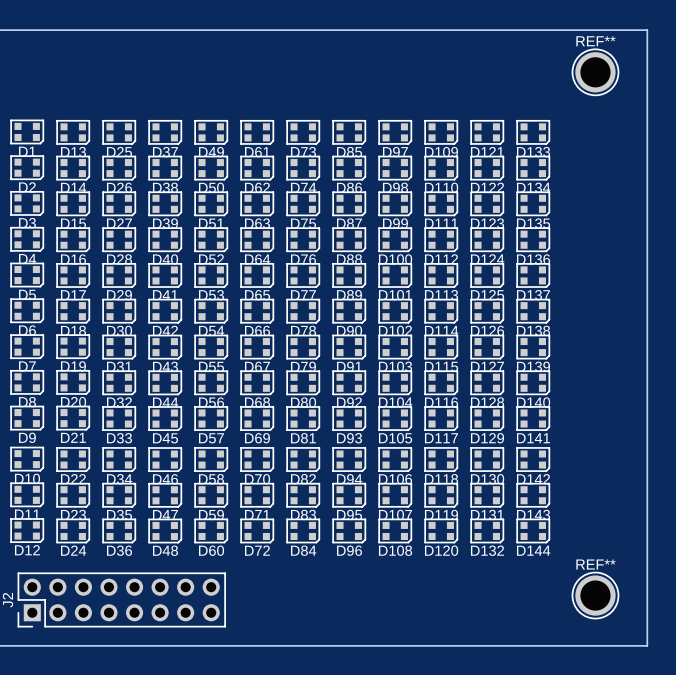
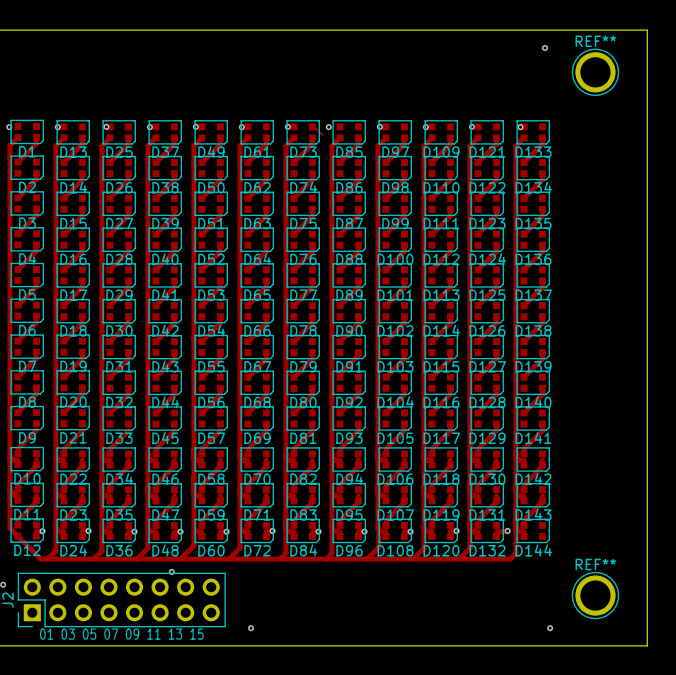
via: none -> (544, 48)
via: none -> (106, 126)
via: none -> (195, 126)
via: none -> (287, 126)
track: none -> (312, 126) (322, 134)
via: none -> (379, 126)
via: none -> (471, 126)
via: none -> (9, 127)
via: none -> (57, 127)
via: none -> (149, 127)
via: none -> (241, 127)
via: none -> (328, 127)
via: none -> (425, 127)
via: none -> (520, 127)
track: none -> (18, 137) (9, 145) (9, 528) (40, 559) (510, 559) (515, 553) (515, 145) (524, 137)
track: none -> (36, 137) (36, 143) (18, 162)
track: none -> (64, 137) (55, 145) (55, 550) (47, 559)
track: none -> (82, 137) (82, 144) (64, 162)
track: none -> (110, 137) (101, 145) (101, 550) (93, 559)
track: none -> (128, 137) (128, 144) (110, 162)
track: none -> (156, 137) (147, 145) (147, 548) (137, 559)
track: none -> (174, 137) (174, 144) (156, 162)
track: none -> (202, 137) (193, 145) (193, 545) (180, 559)
track: none -> (220, 137) (220, 144) (202, 162)
track: none -> (248, 137) (239, 145) (239, 548) (229, 559)
track: none -> (266, 137) (266, 144) (248, 162)
track: none -> (294, 137) (285, 145) (285, 553) (280, 559)
track: none -> (312, 137) (312, 144) (294, 162)
track: none -> (340, 137) (331, 145) (331, 553) (326, 559)
track: none -> (358, 137) (358, 144) (340, 162)
track: none -> (386, 137) (377, 145) (377, 528) (380, 531) (386, 531)
track: none -> (404, 137) (404, 144) (386, 162)
track: none -> (432, 137) (423, 145) (423, 548) (413, 559)
track: none -> (450, 137) (450, 144) (432, 162)
track: none -> (478, 137) (469, 145) (469, 548) (459, 559)
track: none -> (496, 137) (496, 144) (478, 162)
track: none -> (542, 137) (542, 144) (524, 162)
track: none -> (36, 173) (36, 179) (18, 197)
track: none -> (82, 173) (82, 179) (64, 198)
track: none -> (128, 173) (128, 179) (110, 198)
track: none -> (174, 173) (174, 179) (156, 198)
track: none -> (220, 173) (220, 179) (202, 198)
track: none -> (266, 173) (266, 179) (248, 198)
track: none -> (312, 173) (312, 179) (294, 198)
track: none -> (358, 173) (358, 179) (340, 198)
track: none -> (404, 173) (404, 179) (386, 198)
track: none -> (450, 173) (450, 179) (432, 198)
track: none -> (496, 173) (496, 179) (478, 198)
track: none -> (542, 173) (542, 179) (524, 198)
track: none -> (36, 208) (36, 215) (18, 233)
track: none -> (82, 209) (82, 215) (64, 234)
track: none -> (128, 209) (128, 215) (110, 234)
track: none -> (174, 209) (174, 215) (156, 234)
track: none -> (220, 209) (220, 215) (202, 234)
track: none -> (266, 209) (266, 215) (248, 234)
track: none -> (312, 209) (312, 215) (294, 234)
track: none -> (358, 209) (358, 215) (340, 234)
track: none -> (404, 209) (404, 215) (386, 234)
track: none -> (450, 209) (450, 215) (432, 234)
track: none -> (496, 209) (496, 215) (478, 234)
track: none -> (542, 209) (542, 215) (524, 234)
track: none -> (36, 244) (36, 251) (18, 269)
track: none -> (82, 245) (82, 251) (64, 269)
track: none -> (128, 245) (128, 251) (110, 269)
track: none -> (174, 245) (174, 251) (156, 269)
track: none -> (220, 245) (220, 251) (202, 269)
track: none -> (266, 245) (266, 251) (248, 269)
track: none -> (312, 245) (312, 251) (294, 269)
track: none -> (358, 245) (358, 251) (340, 269)
track: none -> (404, 245) (404, 251) (386, 269)
track: none -> (450, 245) (450, 251) (432, 269)
track: none -> (496, 245) (496, 251) (478, 269)
track: none -> (542, 245) (542, 251) (524, 269)
track: none -> (36, 280) (36, 286) (18, 305)
track: none -> (82, 280) (82, 287) (64, 305)
track: none -> (128, 280) (128, 287) (110, 305)
track: none -> (174, 280) (174, 287) (156, 305)
track: none -> (220, 280) (220, 287) (202, 305)
track: none -> (266, 280) (266, 287) (248, 305)
track: none -> (312, 280) (312, 287) (294, 305)
track: none -> (358, 280) (358, 287) (340, 305)
track: none -> (404, 280) (404, 287) (386, 305)
track: none -> (450, 280) (450, 287) (432, 305)
track: none -> (496, 280) (496, 287) (478, 305)
track: none -> (542, 280) (542, 287) (524, 305)
track: none -> (36, 316) (36, 322) (18, 341)
track: none -> (82, 316) (82, 322) (64, 341)
track: none -> (128, 316) (128, 323) (110, 341)
track: none -> (174, 316) (174, 323) (156, 341)
track: none -> (220, 316) (220, 323) (202, 341)
track: none -> (266, 316) (266, 323) (248, 341)
track: none -> (312, 316) (312, 323) (294, 341)
track: none -> (358, 316) (358, 323) (340, 341)
track: none -> (404, 316) (404, 323) (386, 341)
track: none -> (450, 316) (450, 323) (432, 341)
track: none -> (496, 316) (496, 323) (478, 341)
track: none -> (542, 316) (542, 323) (524, 341)
track: none -> (36, 352) (36, 358) (18, 376)
track: none -> (82, 352) (82, 358) (64, 376)
track: none -> (128, 352) (128, 358) (110, 377)
track: none -> (174, 352) (174, 358) (156, 377)
track: none -> (220, 352) (220, 358) (202, 377)
track: none -> (266, 352) (266, 358) (248, 377)
track: none -> (312, 352) (312, 358) (294, 377)
track: none -> (358, 352) (358, 355) (340, 374) (340, 377)
track: none -> (404, 352) (404, 358) (386, 377)
track: none -> (450, 352) (450, 358) (432, 377)
track: none -> (496, 352) (496, 358) (478, 377)
track: none -> (542, 352) (542, 358) (524, 377)
track: none -> (36, 387) (36, 394) (18, 412)
track: none -> (82, 387) (82, 394) (64, 412)
track: none -> (128, 388) (128, 394) (110, 412)
track: none -> (174, 388) (174, 394) (156, 413)
track: none -> (220, 388) (220, 394) (202, 412)
track: none -> (266, 388) (266, 394) (248, 412)
track: none -> (312, 388) (312, 394) (294, 413)
track: none -> (358, 388) (358, 393) (340, 412)
track: none -> (404, 388) (404, 394) (386, 412)
track: none -> (450, 388) (450, 394) (432, 412)
track: none -> (496, 388) (496, 394) (478, 412)
track: none -> (542, 388) (542, 394) (524, 412)
track: none -> (266, 424) (266, 430) (248, 449)
track: none -> (312, 424) (312, 430) (294, 449)
track: none -> (358, 424) (358, 430) (340, 449)
track: none -> (404, 424) (404, 430) (386, 449)
track: none -> (450, 424) (450, 430) (432, 449)
track: none -> (496, 424) (496, 430) (478, 449)
track: none -> (542, 424) (542, 430) (524, 449)
track: none -> (36, 430) (18, 448)
track: none -> (82, 430) (64, 449)
track: none -> (128, 430) (110, 449)
track: none -> (174, 430) (156, 449)
track: none -> (220, 430) (202, 449)
track: none -> (9, 456) (12, 459) (18, 459)
track: none -> (55, 457) (58, 460) (64, 460)
track: none -> (101, 457) (104, 460) (110, 460)
track: none -> (147, 457) (150, 460) (156, 460)
track: none -> (193, 457) (196, 460) (202, 460)
track: none -> (239, 457) (242, 460) (248, 460)
track: none -> (285, 457) (288, 460) (294, 460)
track: none -> (331, 457) (334, 460) (340, 460)
track: none -> (377, 457) (380, 460) (386, 460)
track: none -> (423, 457) (426, 460) (432, 460)
track: none -> (469, 457) (472, 460) (478, 460)
track: none -> (515, 457) (519, 460) (524, 460)
track: none -> (36, 459) (36, 466) (18, 484)
track: none -> (82, 460) (82, 466) (64, 484)
track: none -> (128, 460) (128, 466) (110, 484)
track: none -> (174, 460) (174, 466) (156, 484)
track: none -> (220, 460) (220, 466) (202, 484)
track: none -> (266, 460) (266, 466) (248, 484)
track: none -> (312, 460) (312, 466) (294, 484)
track: none -> (358, 460) (358, 466) (340, 484)
track: none -> (404, 460) (404, 466) (386, 484)
track: none -> (450, 460) (450, 466) (432, 484)
track: none -> (496, 460) (496, 466) (478, 484)
track: none -> (542, 460) (542, 466) (524, 484)
track: none -> (9, 490) (18, 495)
track: none -> (55, 492) (58, 495) (64, 495)
track: none -> (101, 492) (104, 495) (110, 495)
track: none -> (147, 492) (150, 496) (156, 496)
track: none -> (193, 492) (196, 495) (202, 495)
track: none -> (239, 492) (242, 495) (248, 495)
track: none -> (285, 492) (288, 495) (294, 495)
track: none -> (331, 492) (335, 495) (340, 495)
track: none -> (377, 492) (380, 495) (386, 495)
track: none -> (423, 492) (426, 495) (432, 495)
track: none -> (469, 492) (472, 495) (478, 495)
track: none -> (515, 492) (519, 495) (524, 495)
track: none -> (36, 495) (36, 501) (18, 520)
track: none -> (82, 495) (82, 502) (64, 520)
track: none -> (128, 495) (128, 502) (110, 520)
track: none -> (220, 495) (220, 502) (202, 520)
track: none -> (266, 495) (266, 502) (248, 520)
track: none -> (312, 495) (312, 502) (294, 520)
track: none -> (358, 495) (358, 502) (340, 520)
track: none -> (404, 495) (404, 502) (386, 520)
track: none -> (450, 495) (450, 502) (432, 520)
track: none -> (496, 495) (496, 502) (478, 520)
track: none -> (542, 495) (542, 502) (524, 520)
track: none -> (174, 496) (174, 502) (156, 520)
track: none -> (55, 528) (58, 531) (64, 531)
track: none -> (101, 528) (104, 531) (110, 531)
track: none -> (147, 528) (150, 531) (156, 531)
track: none -> (193, 528) (196, 531) (202, 531)
track: none -> (239, 528) (242, 531) (248, 531)
track: none -> (285, 528) (288, 531) (294, 531)
track: none -> (331, 528) (334, 531) (340, 531)
track: none -> (423, 528) (426, 531) (432, 531)
track: none -> (469, 528) (472, 531) (478, 531)
track: none -> (515, 528) (519, 531) (524, 531)
track: none -> (378, 529) (378, 547) (367, 559)
track: none -> (88, 530) (82, 531)
via: none -> (88, 530)
track: none -> (272, 530) (266, 531)
via: none -> (272, 530)
track: none -> (456, 530) (450, 531)
via: none -> (456, 530)
track: none -> (507, 530) (496, 531)
via: none -> (507, 530)
track: none -> (36, 531) (42, 531)
via: none -> (42, 531)
track: none -> (128, 531) (134, 531)
via: none -> (134, 531)
track: none -> (174, 531) (180, 531)
via: none -> (180, 531)
track: none -> (220, 531) (226, 531)
via: none -> (226, 531)
track: none -> (312, 531) (318, 531)
via: none -> (318, 531)
track: none -> (358, 531) (364, 531)
via: none -> (364, 531)
track: none -> (404, 531) (410, 531)
via: none -> (410, 531)
via: none -> (171, 571)
via: none -> (3, 584)
via: none -> (251, 628)
via: none -> (550, 628)
text: none -> 01 03 05 07 09 11 13 15 (121, 634)

